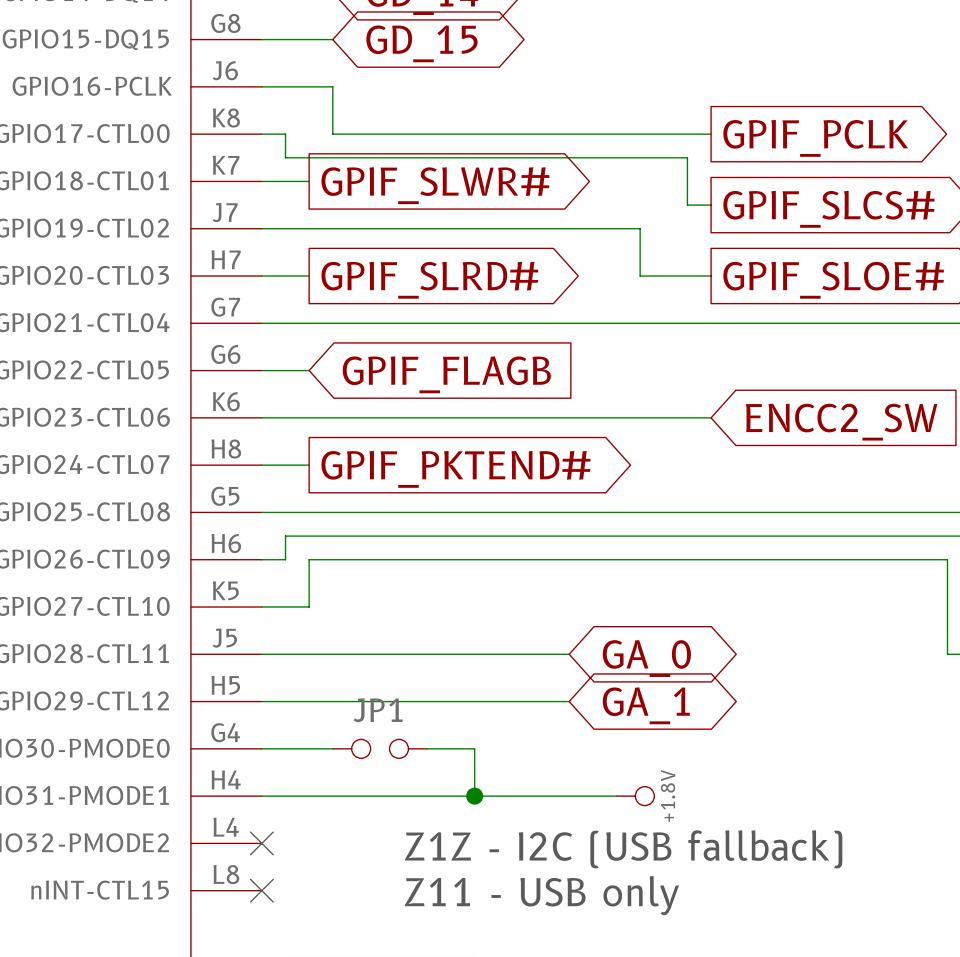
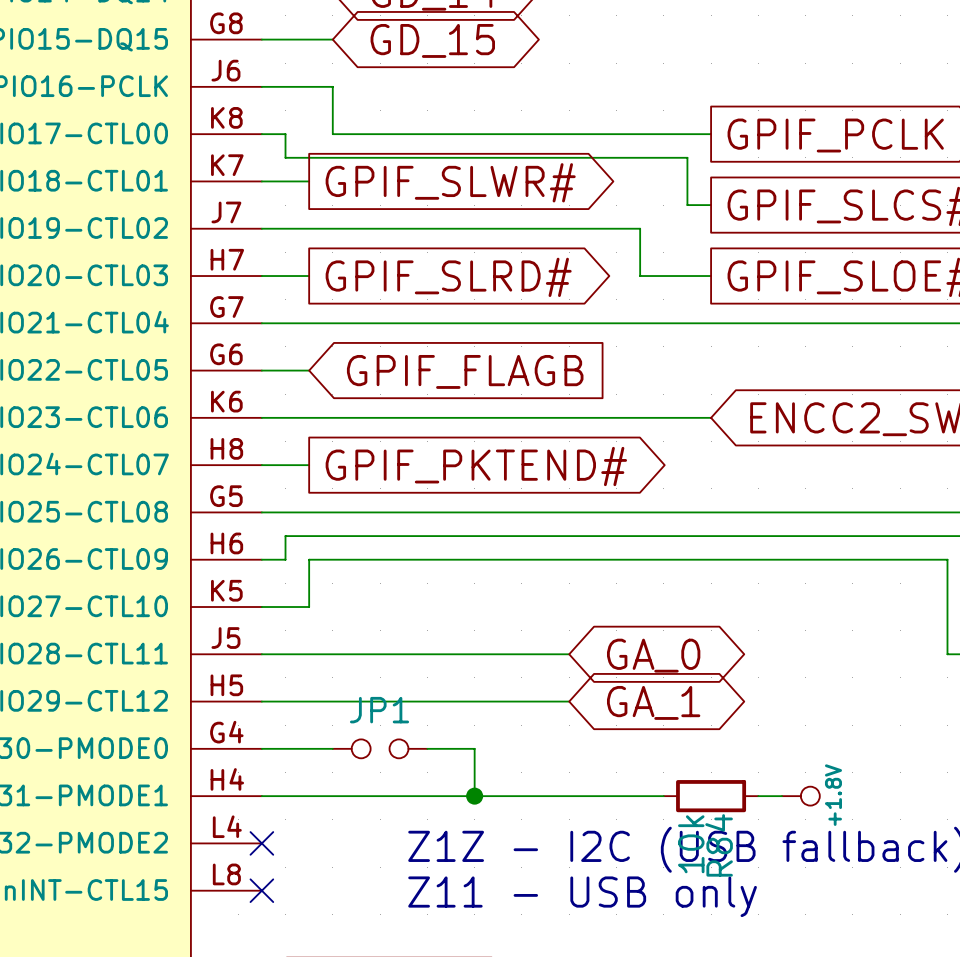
wire: none -> (616, 796) (663, 796)
power symbol position: +1.8V (635, 796) -> +1.8V (800, 796)
R84: none -> 10k (711, 796)
wire: none -> (758, 796) (781, 796)

